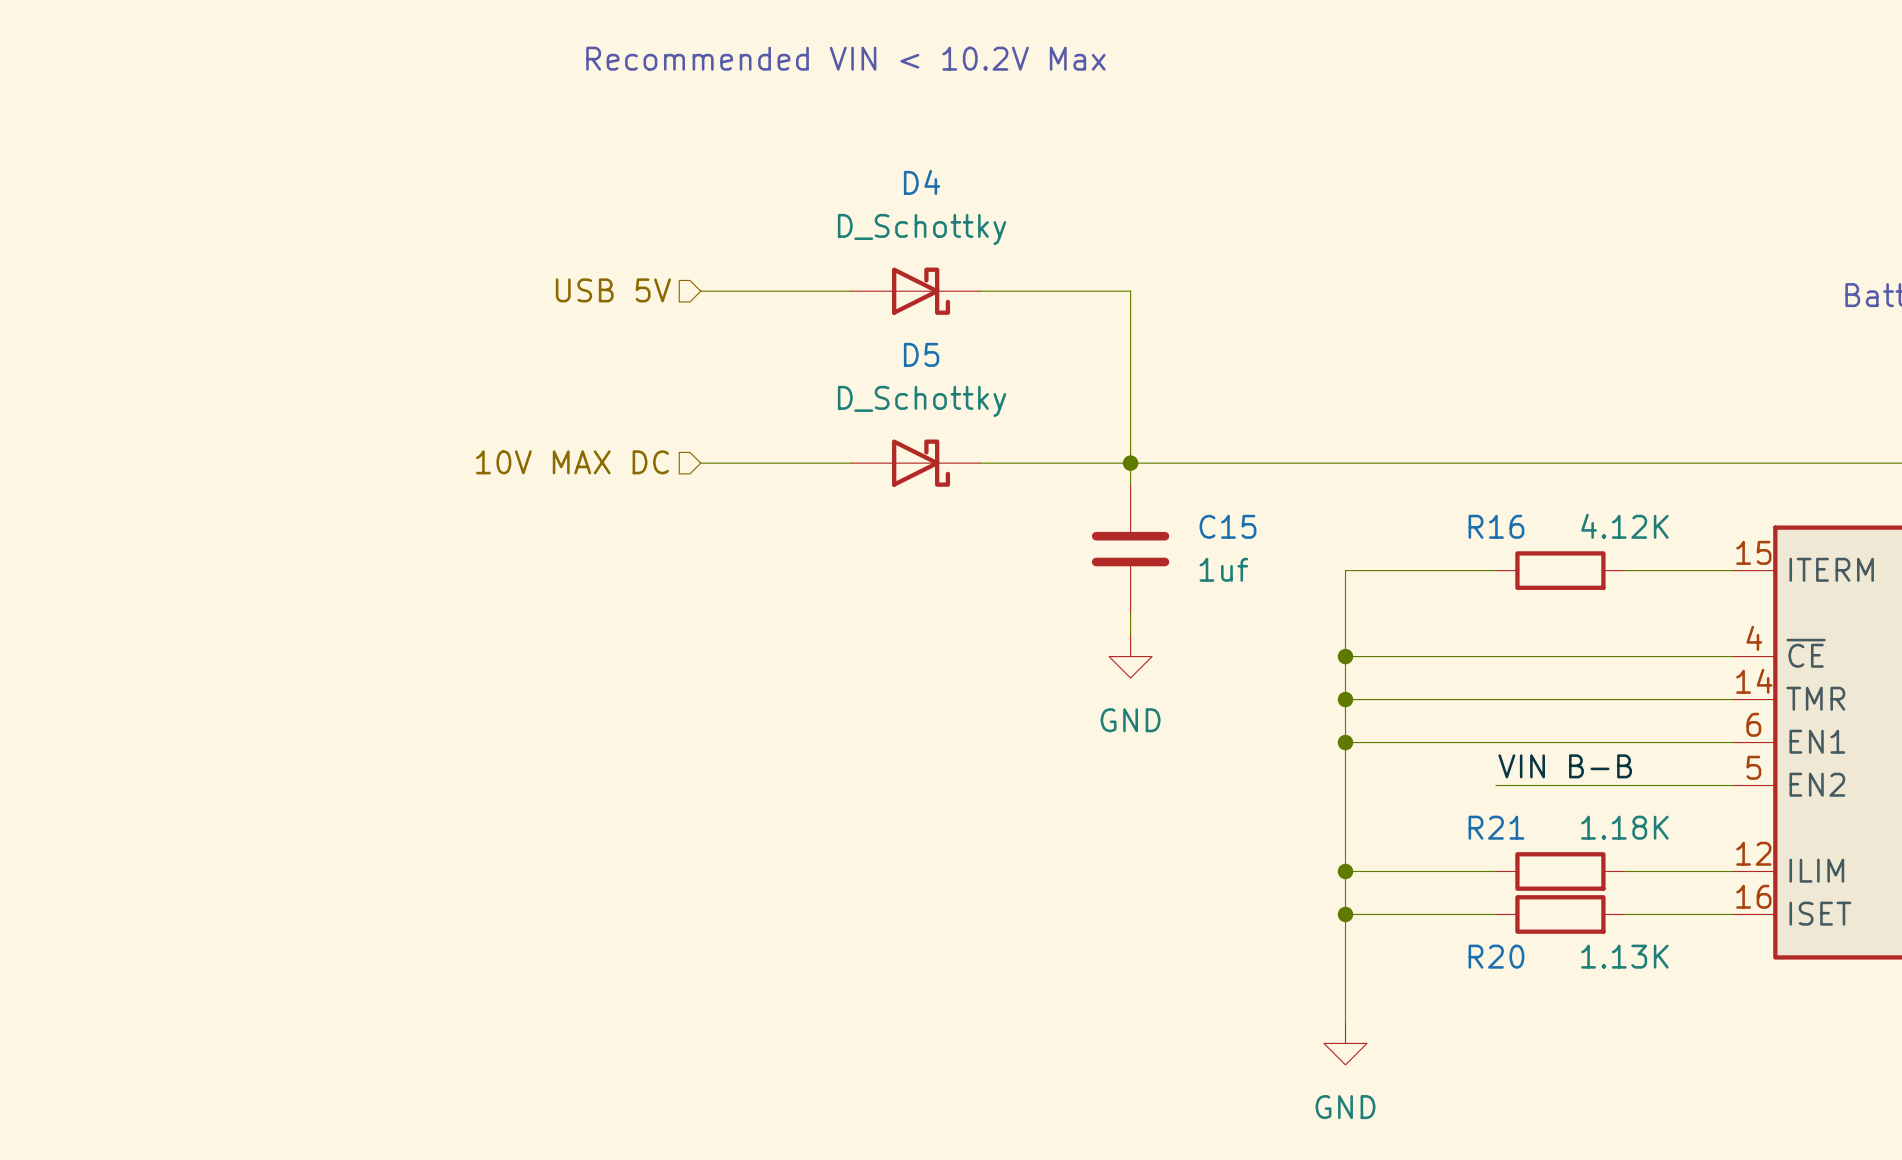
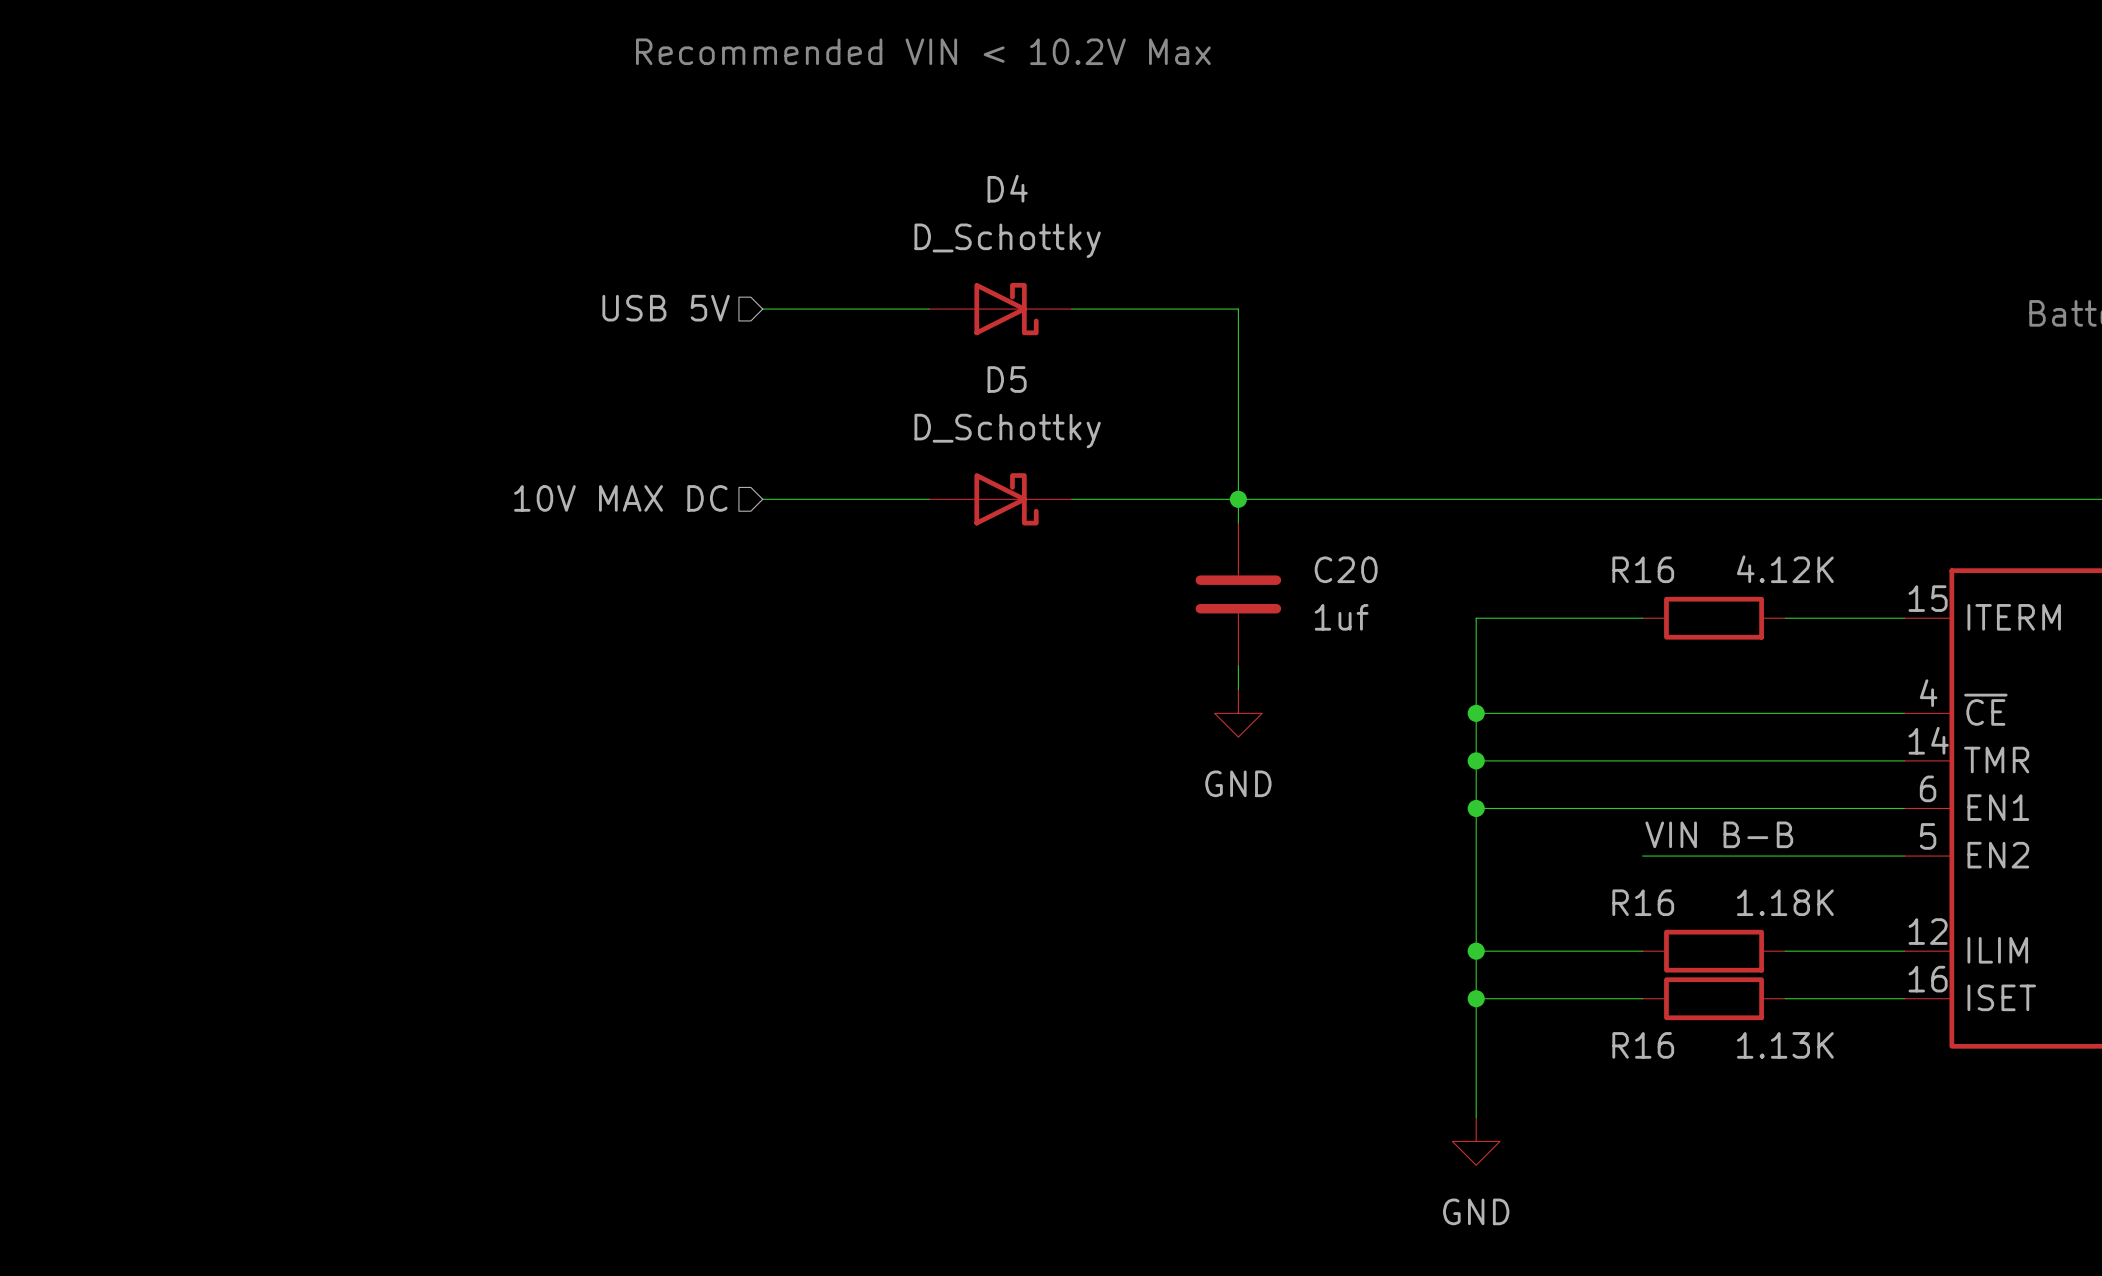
C15 name: C15 (1227, 526) -> C20 (1346, 569)
R21 name: R21 (1496, 827) -> R16 (1643, 902)
R20 name: R20 (1496, 956) -> R16 (1643, 1045)

